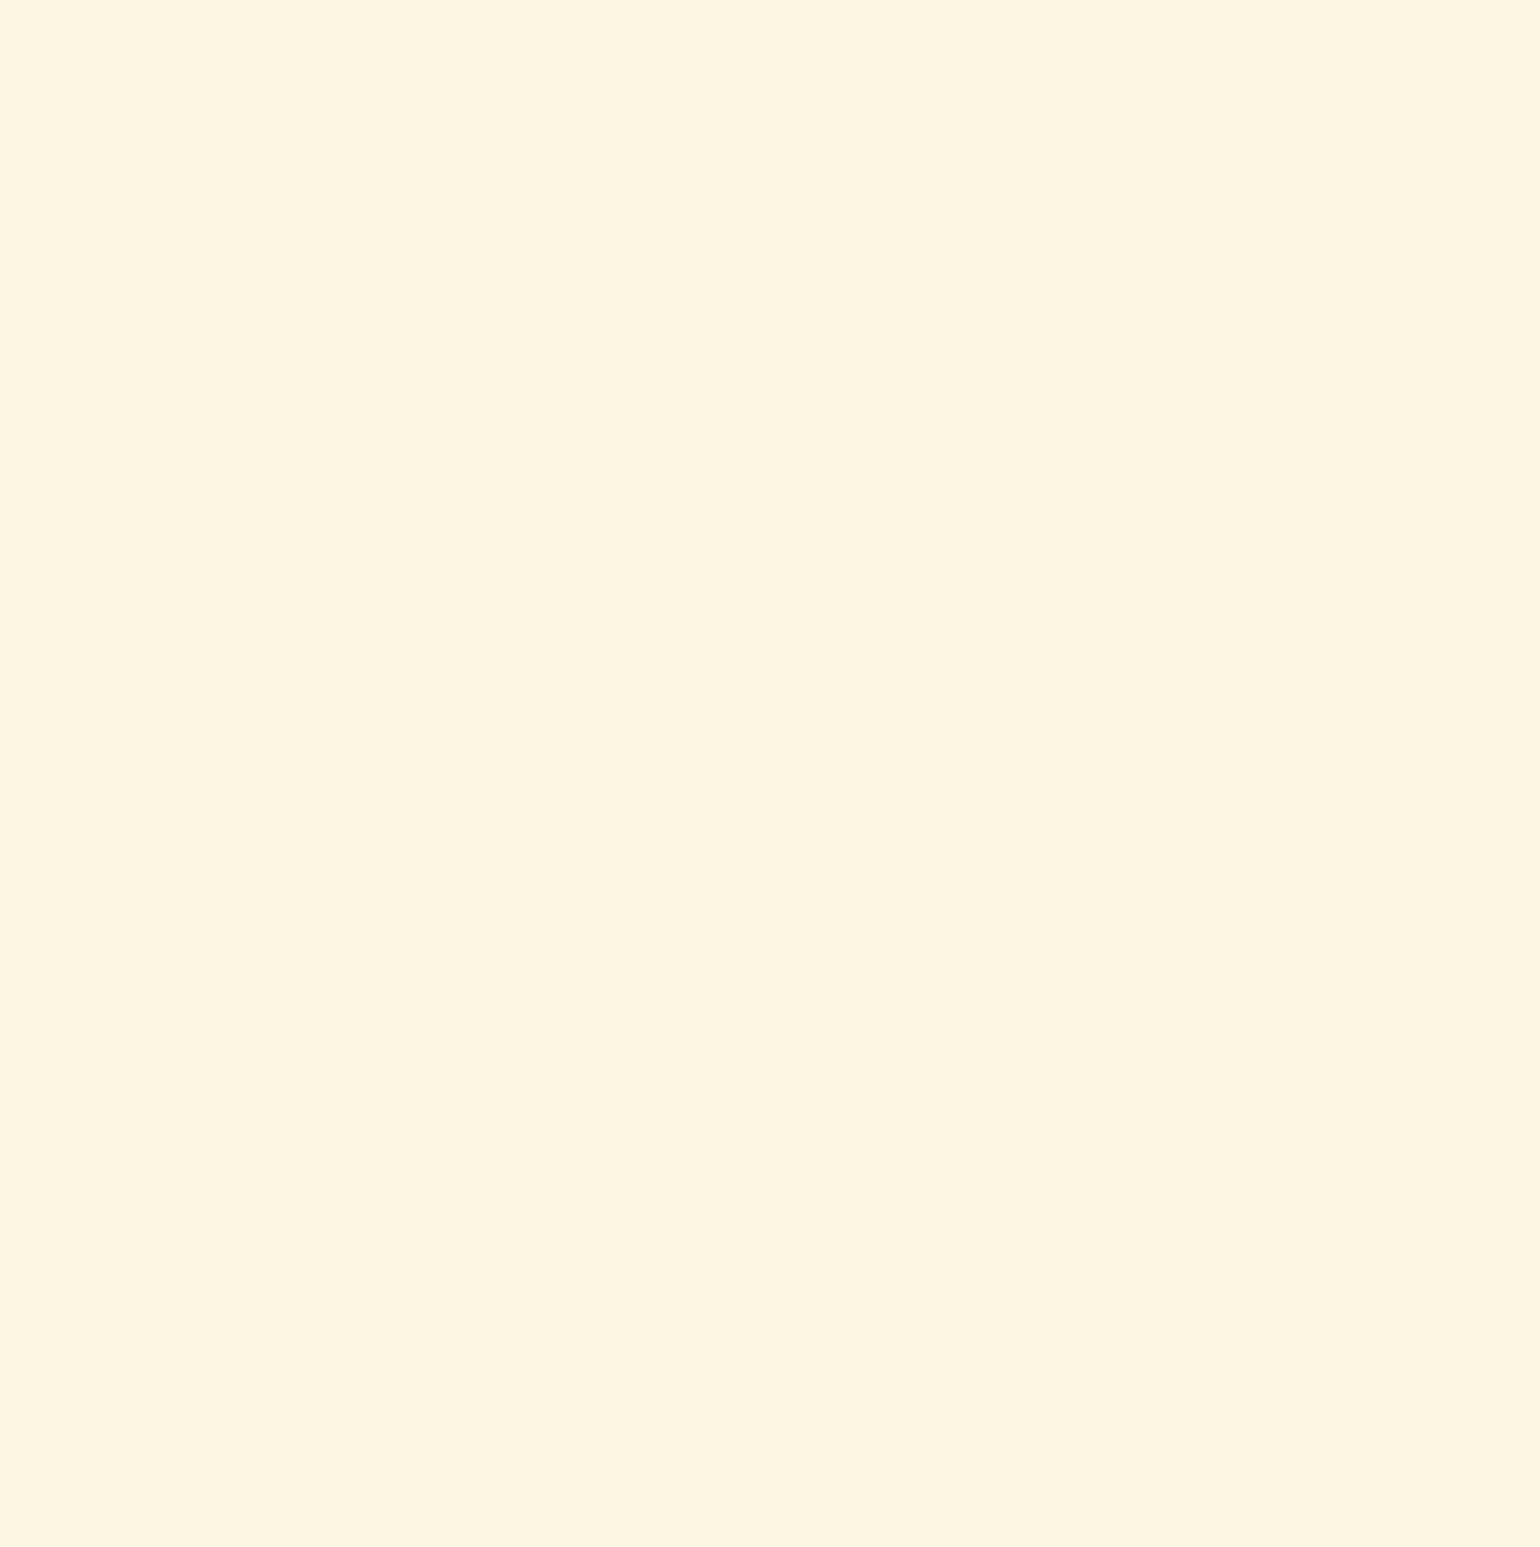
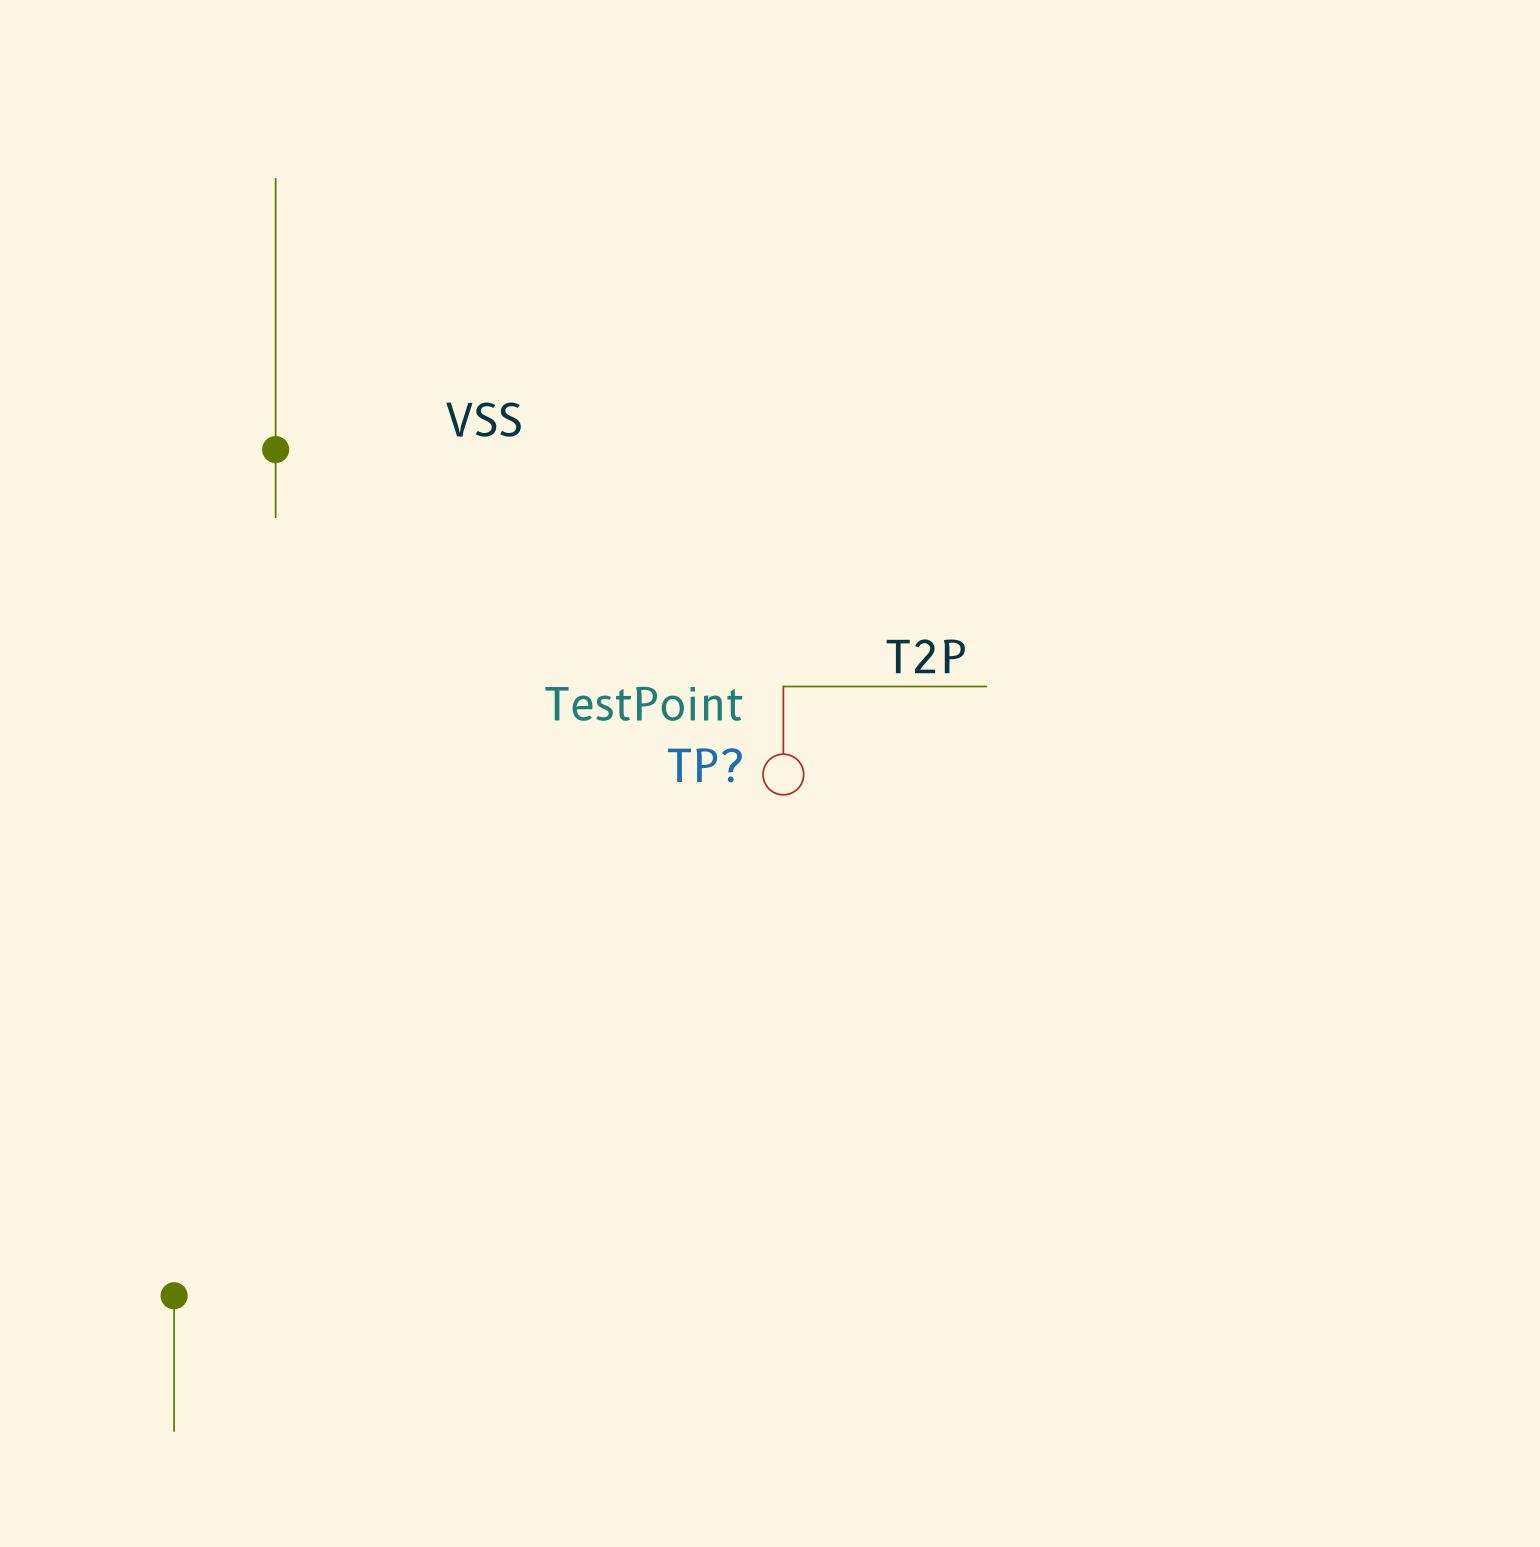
wire: none -> (275, 178) (275, 517)
label: none -> VSS (483, 419)
junction: none -> (275, 449)
label: none -> T2P (925, 656)
wire: none -> (783, 686) (986, 686)
TP?: none -> TestPoint (783, 740)
wire: none -> (174, 1295) (174, 1431)
junction: none -> (174, 1295)

